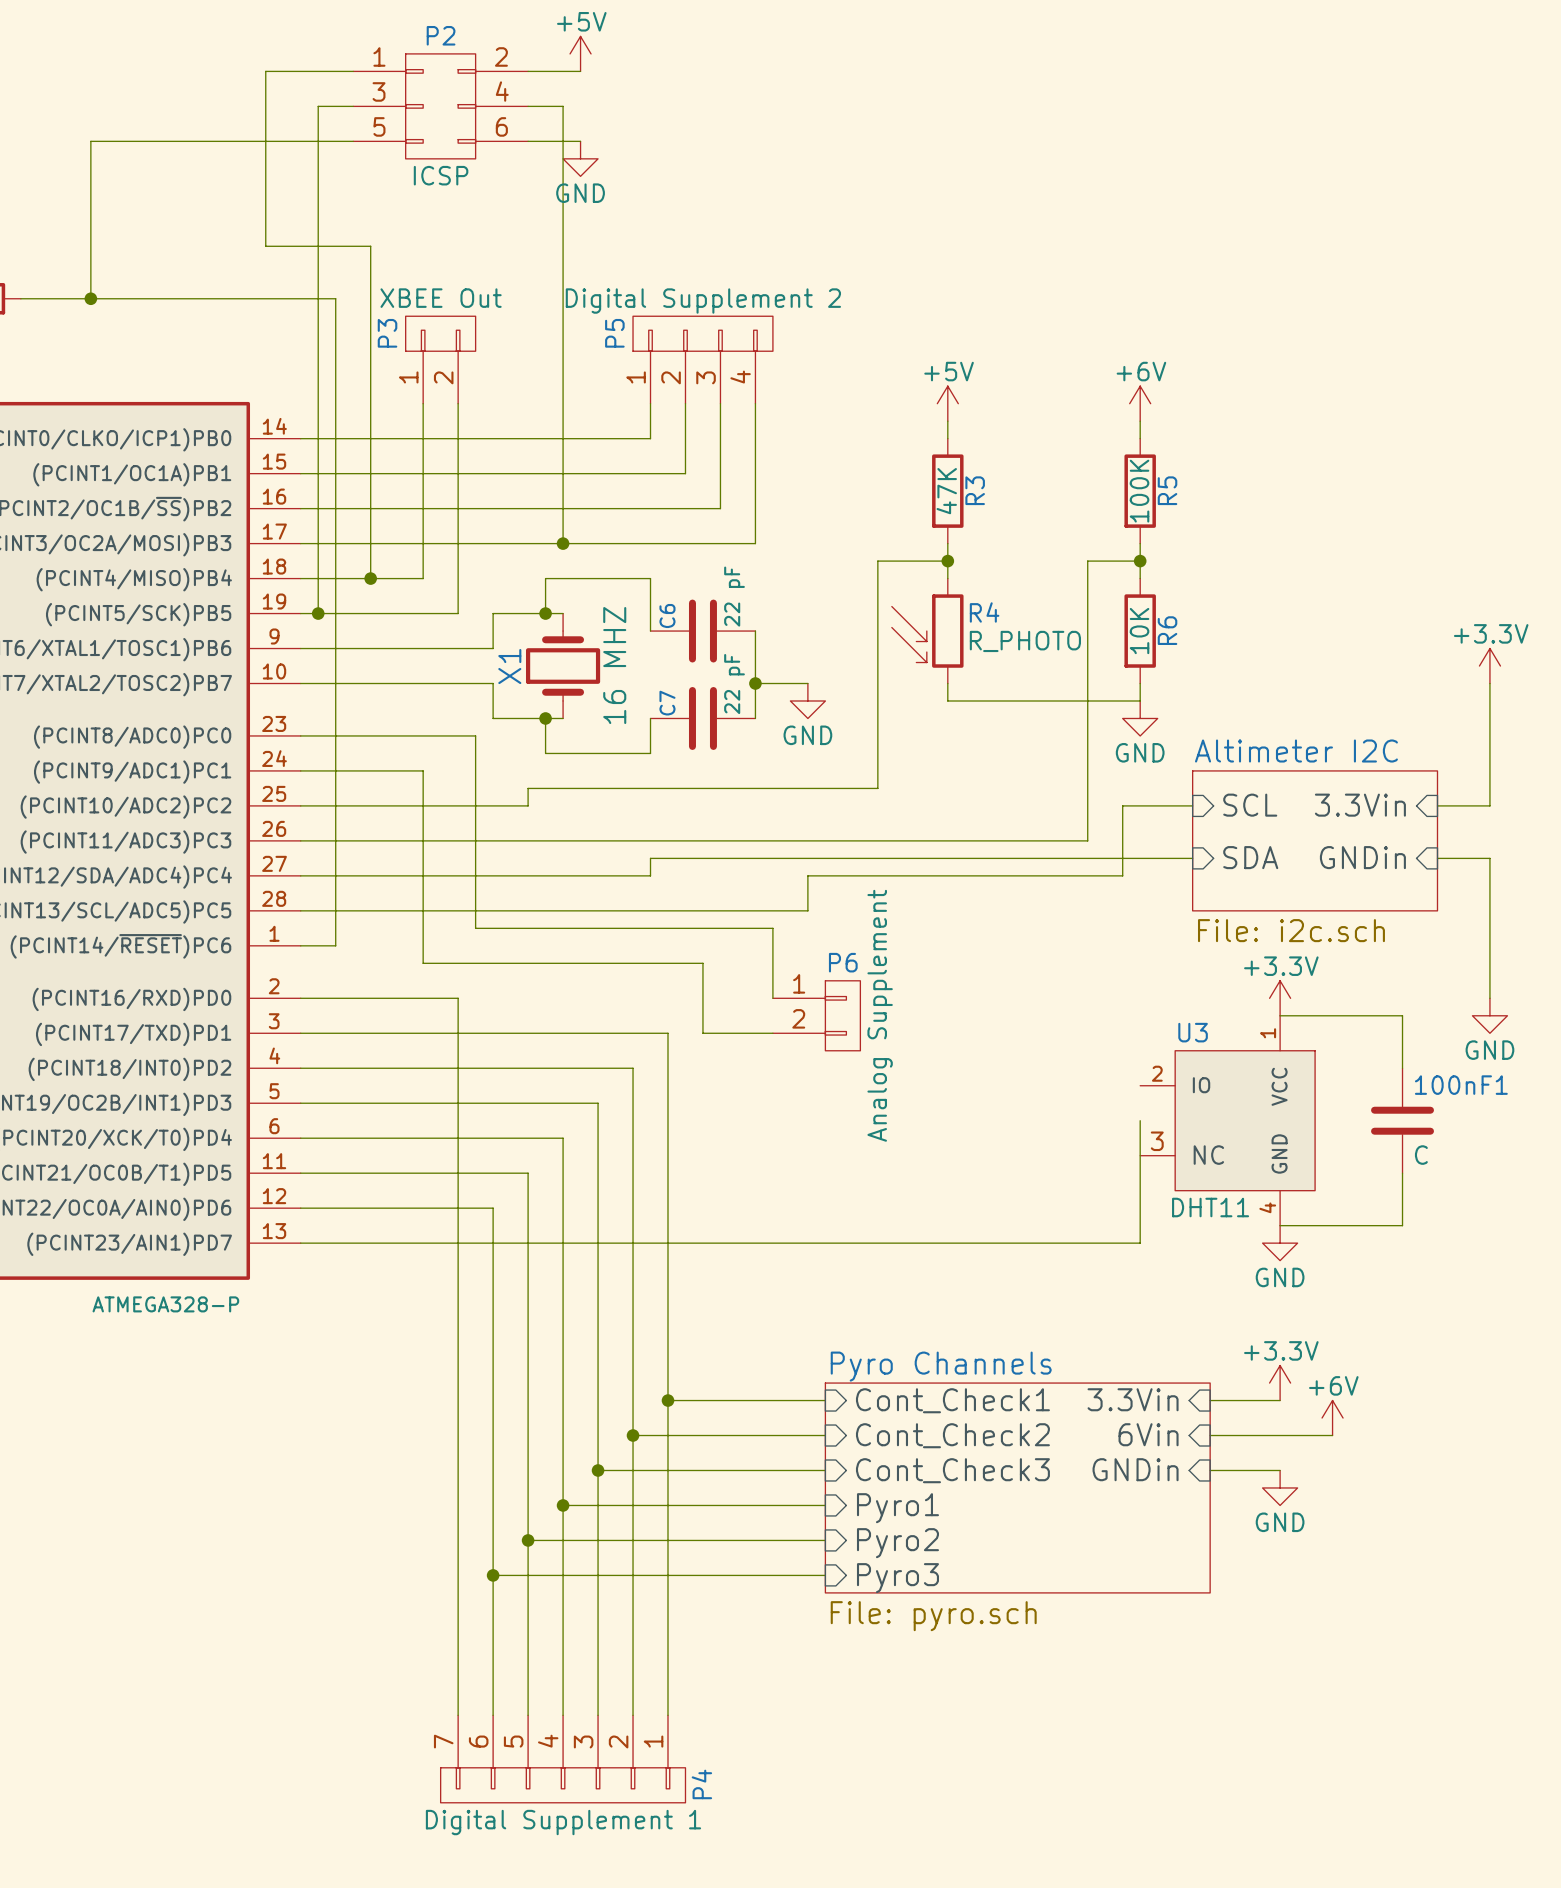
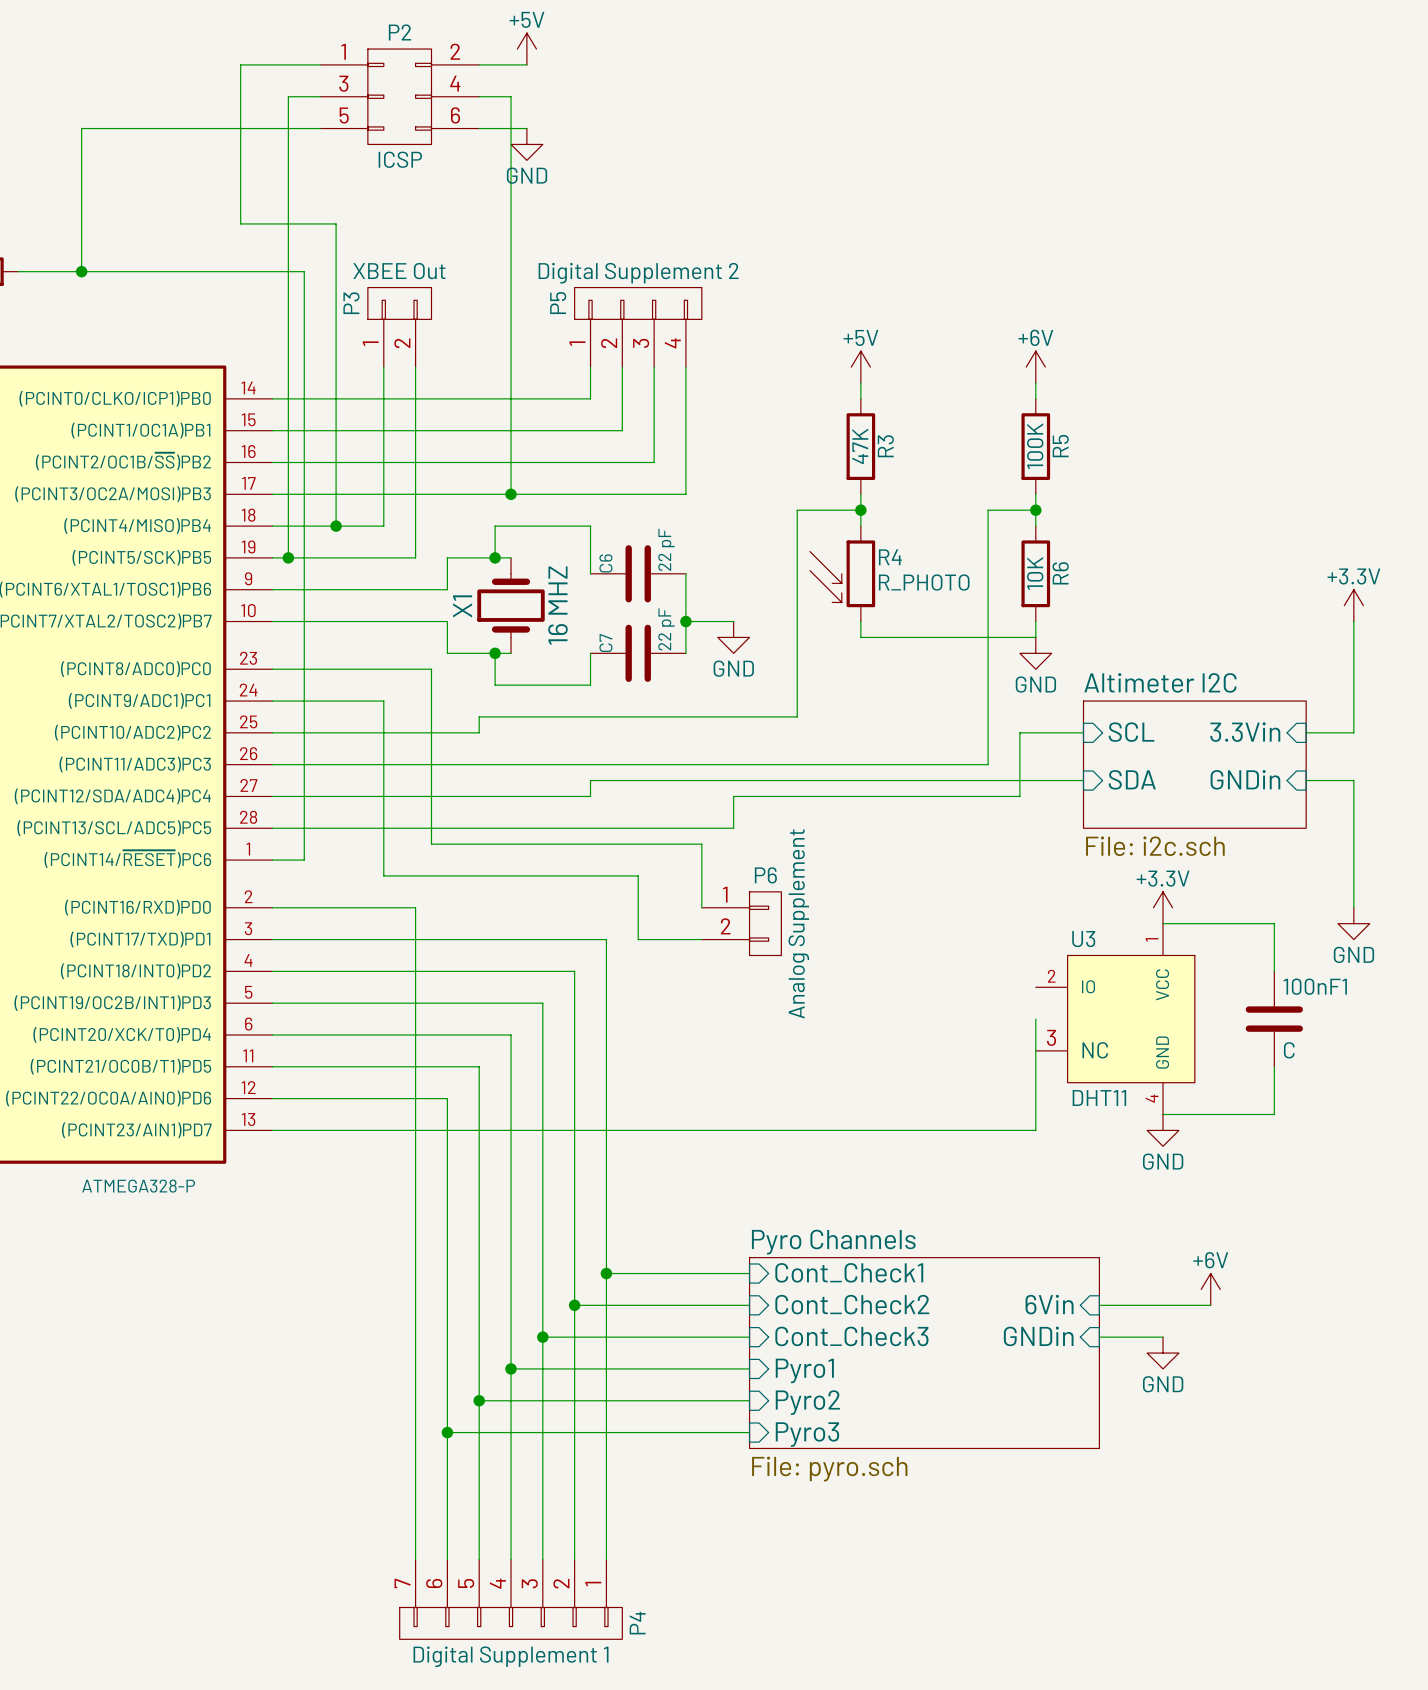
power symbol: +3.3V (1280, 1383) -> none
sheet pin: 3.3Vin (1133, 1399) -> none
wire: (1210, 1400) (1280, 1400) -> none

